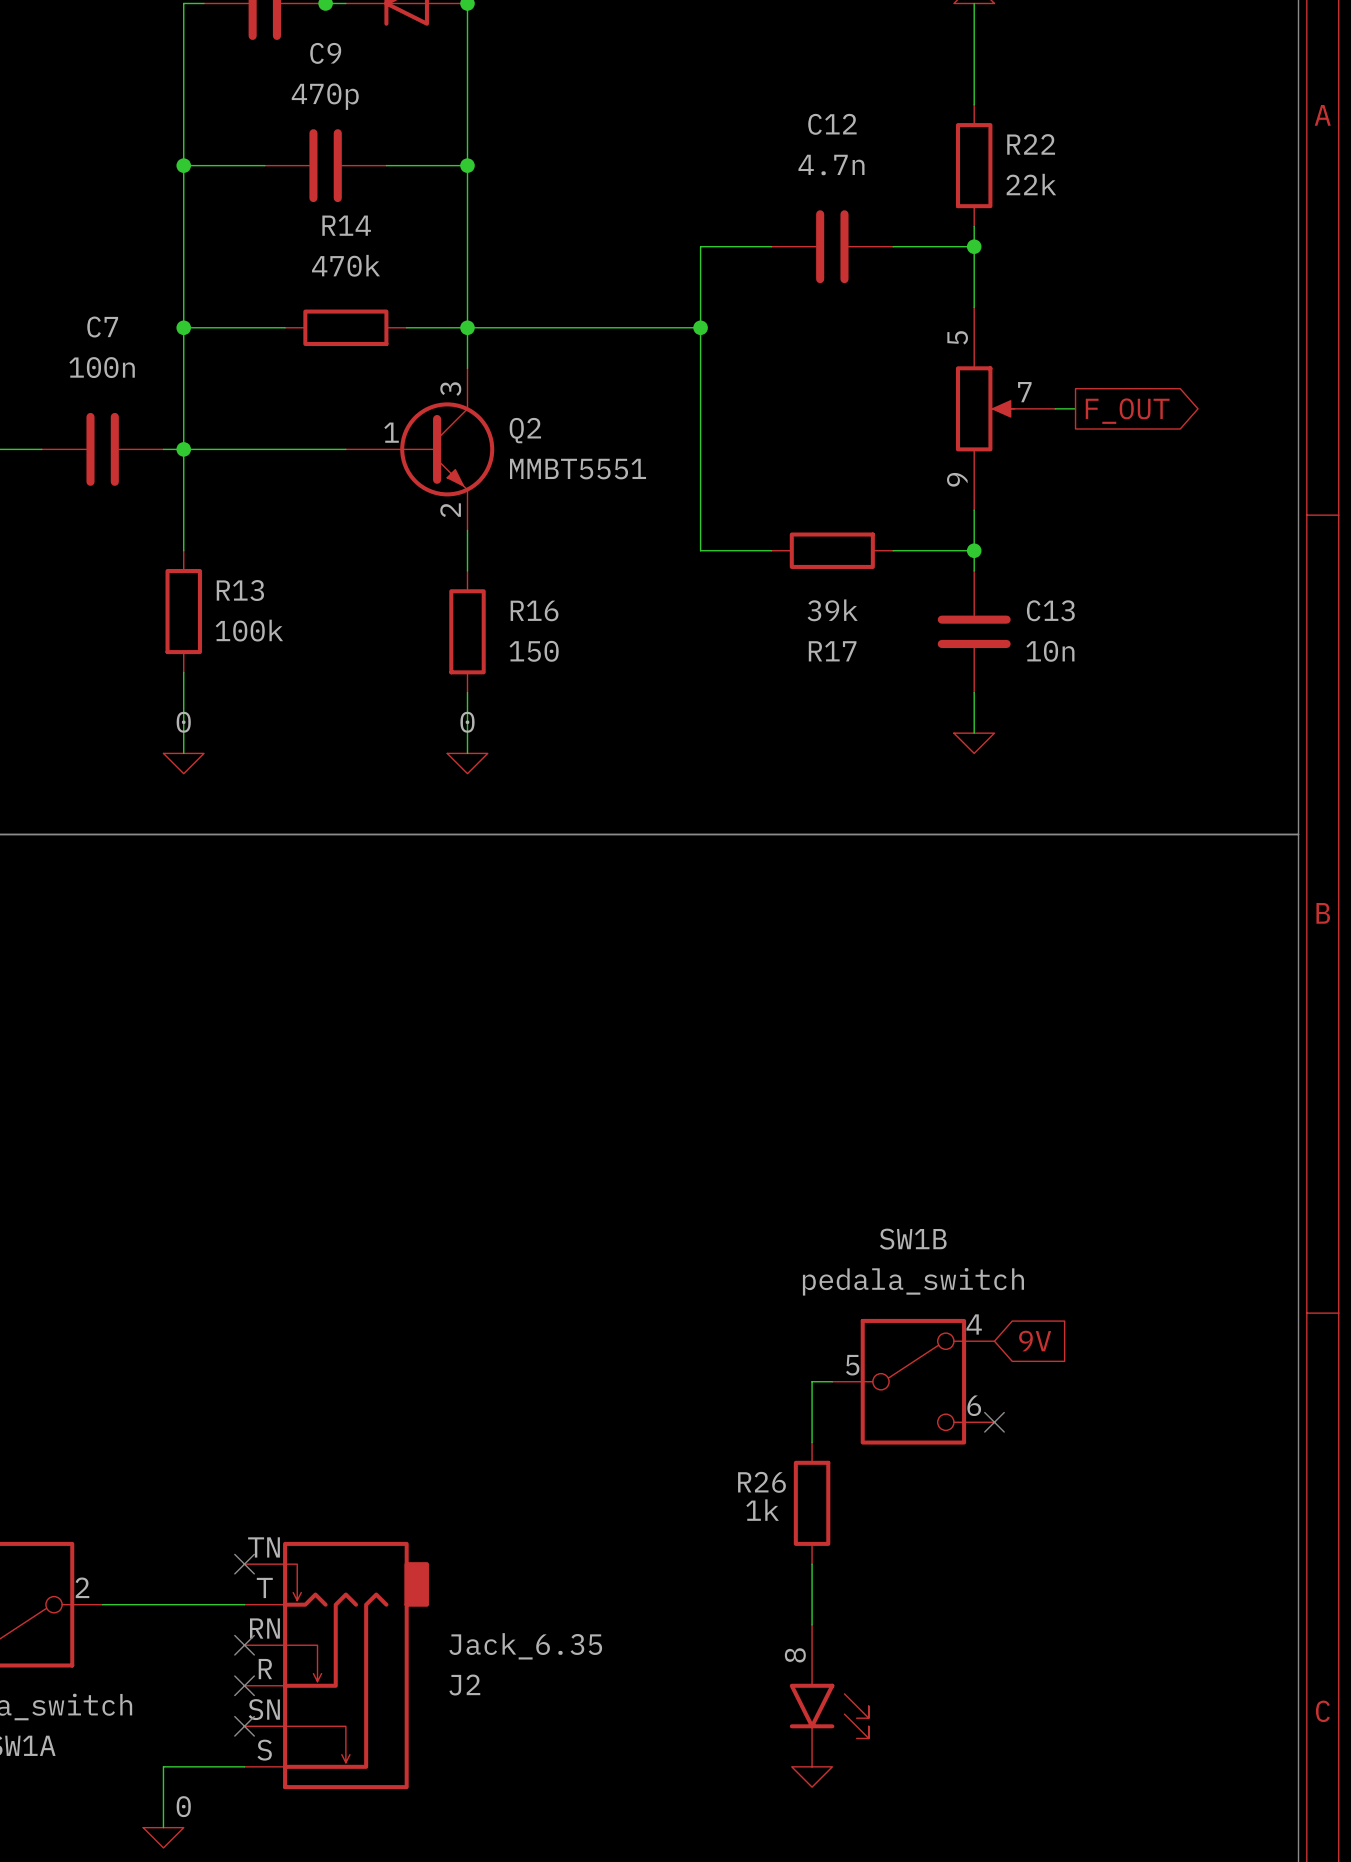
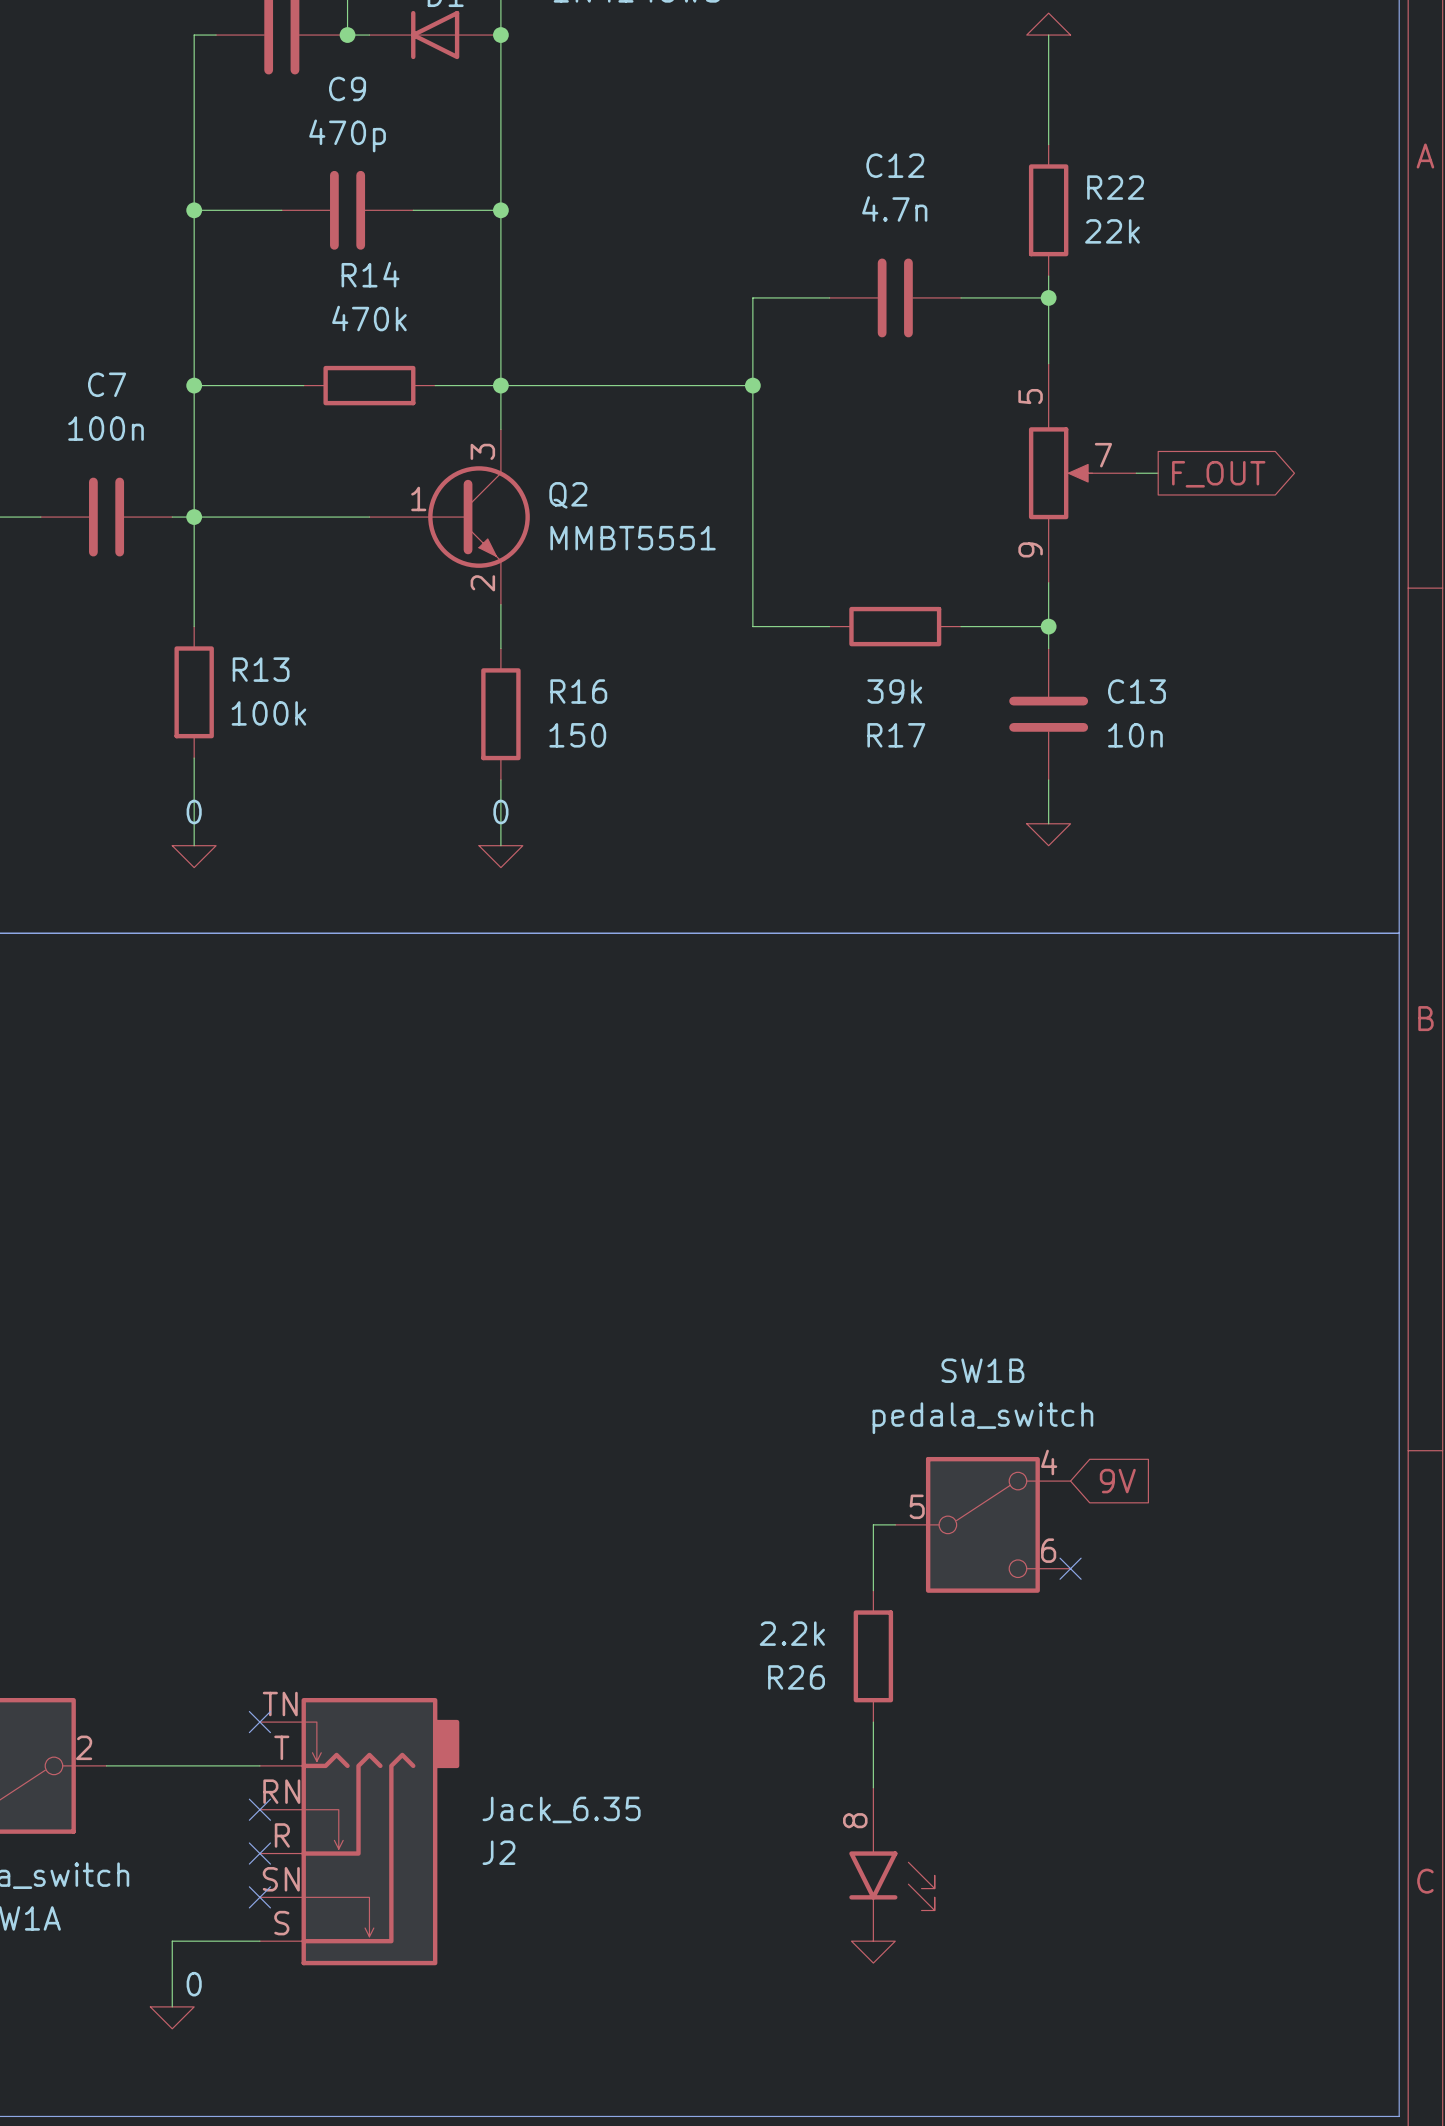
R26 name position: R26 (761, 1482) -> R26 (796, 1677)
R26 value: 1k (762, 1510) -> 2.2k (792, 1633)

